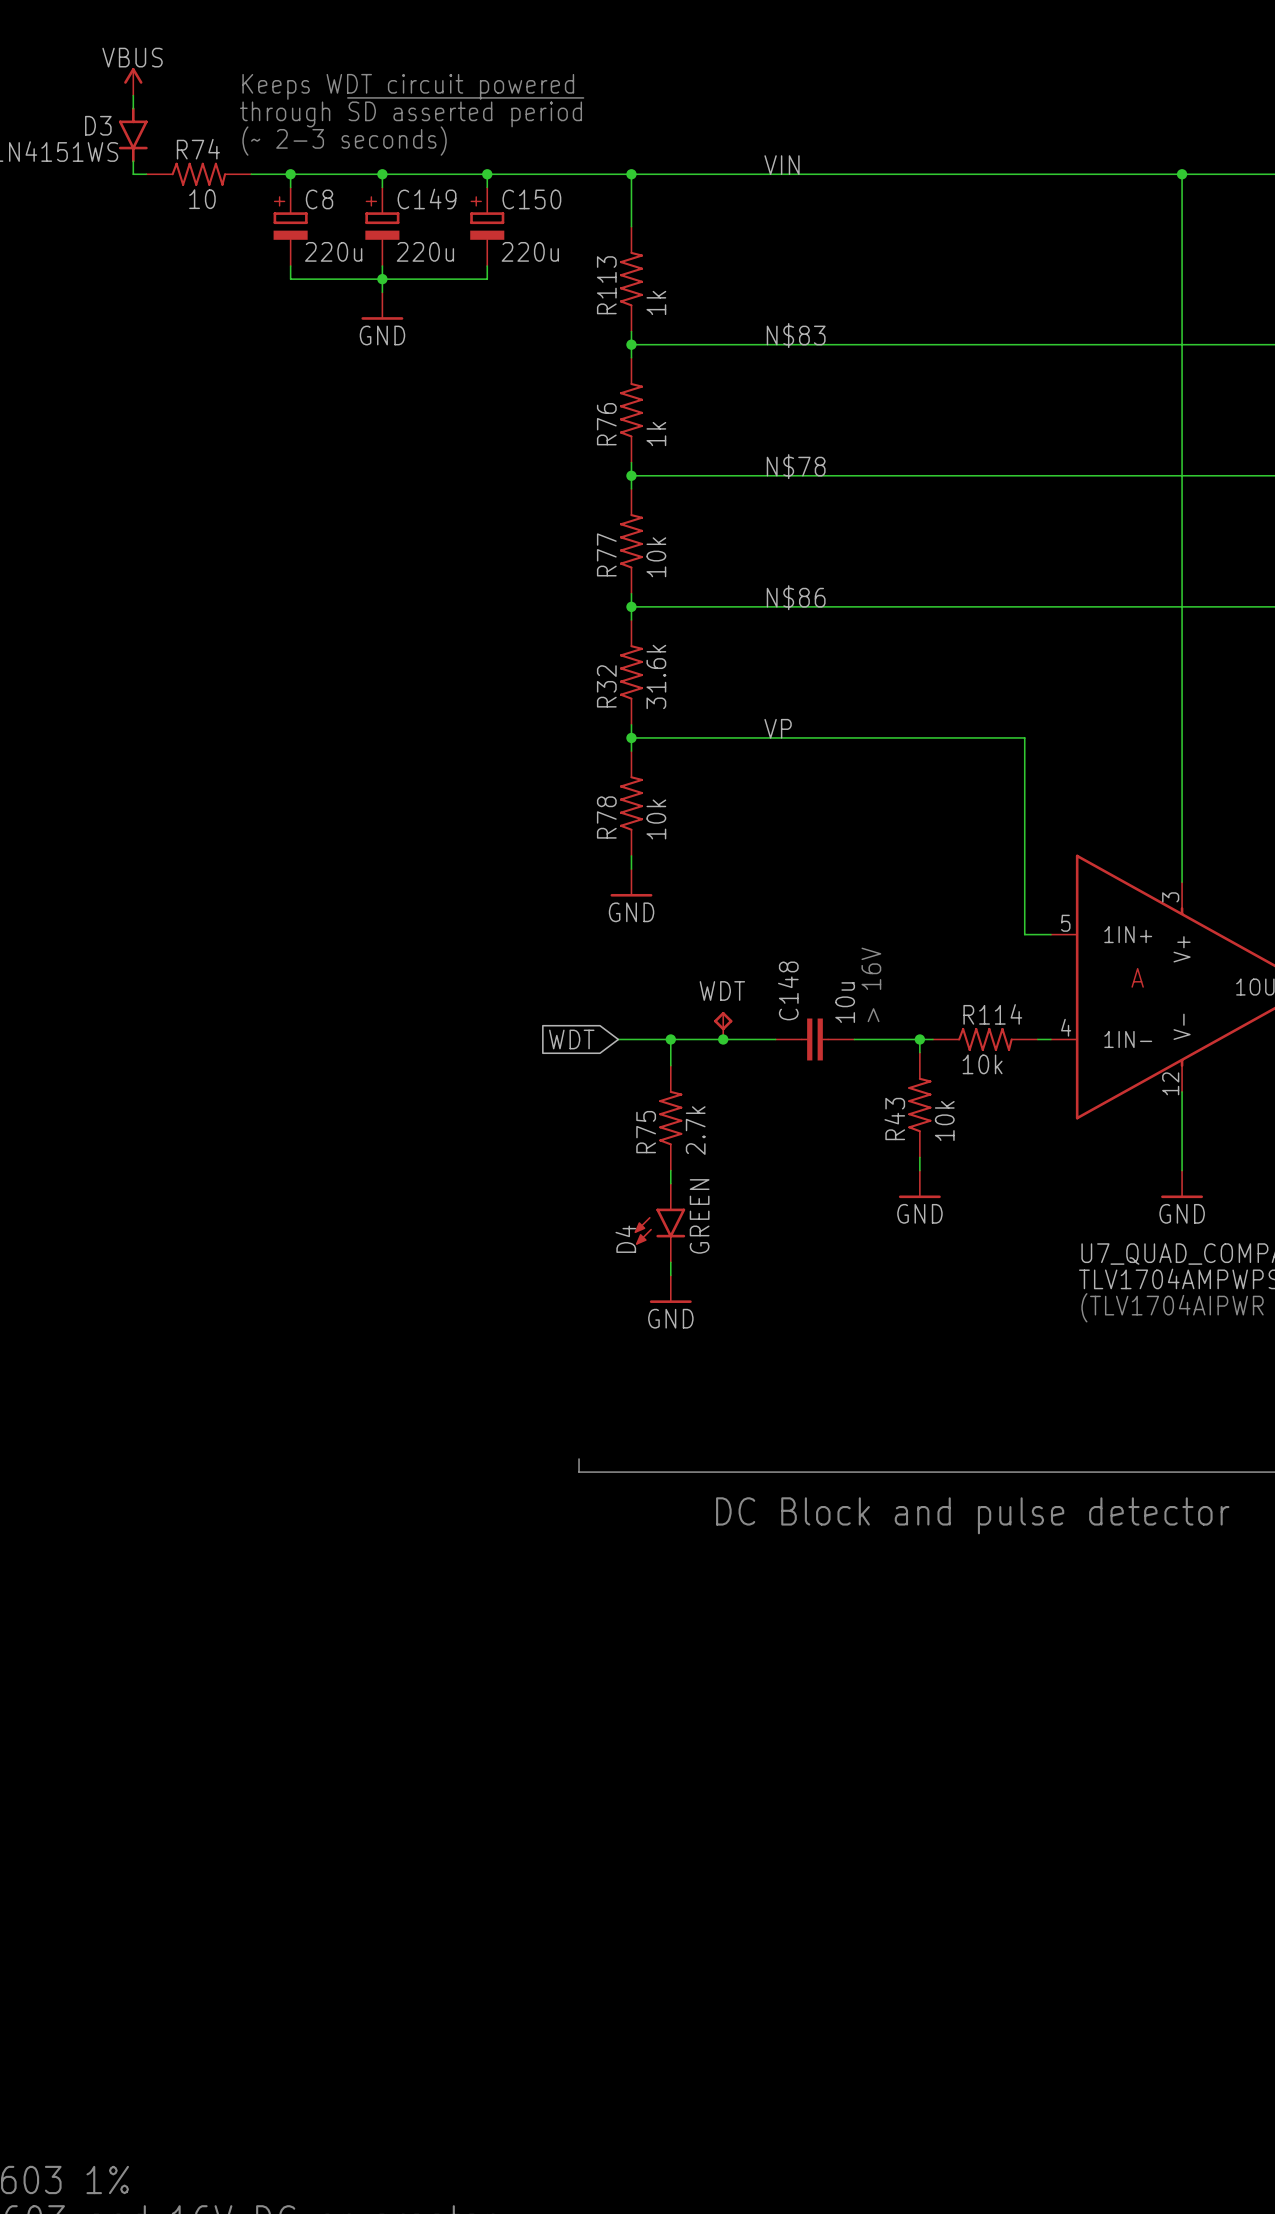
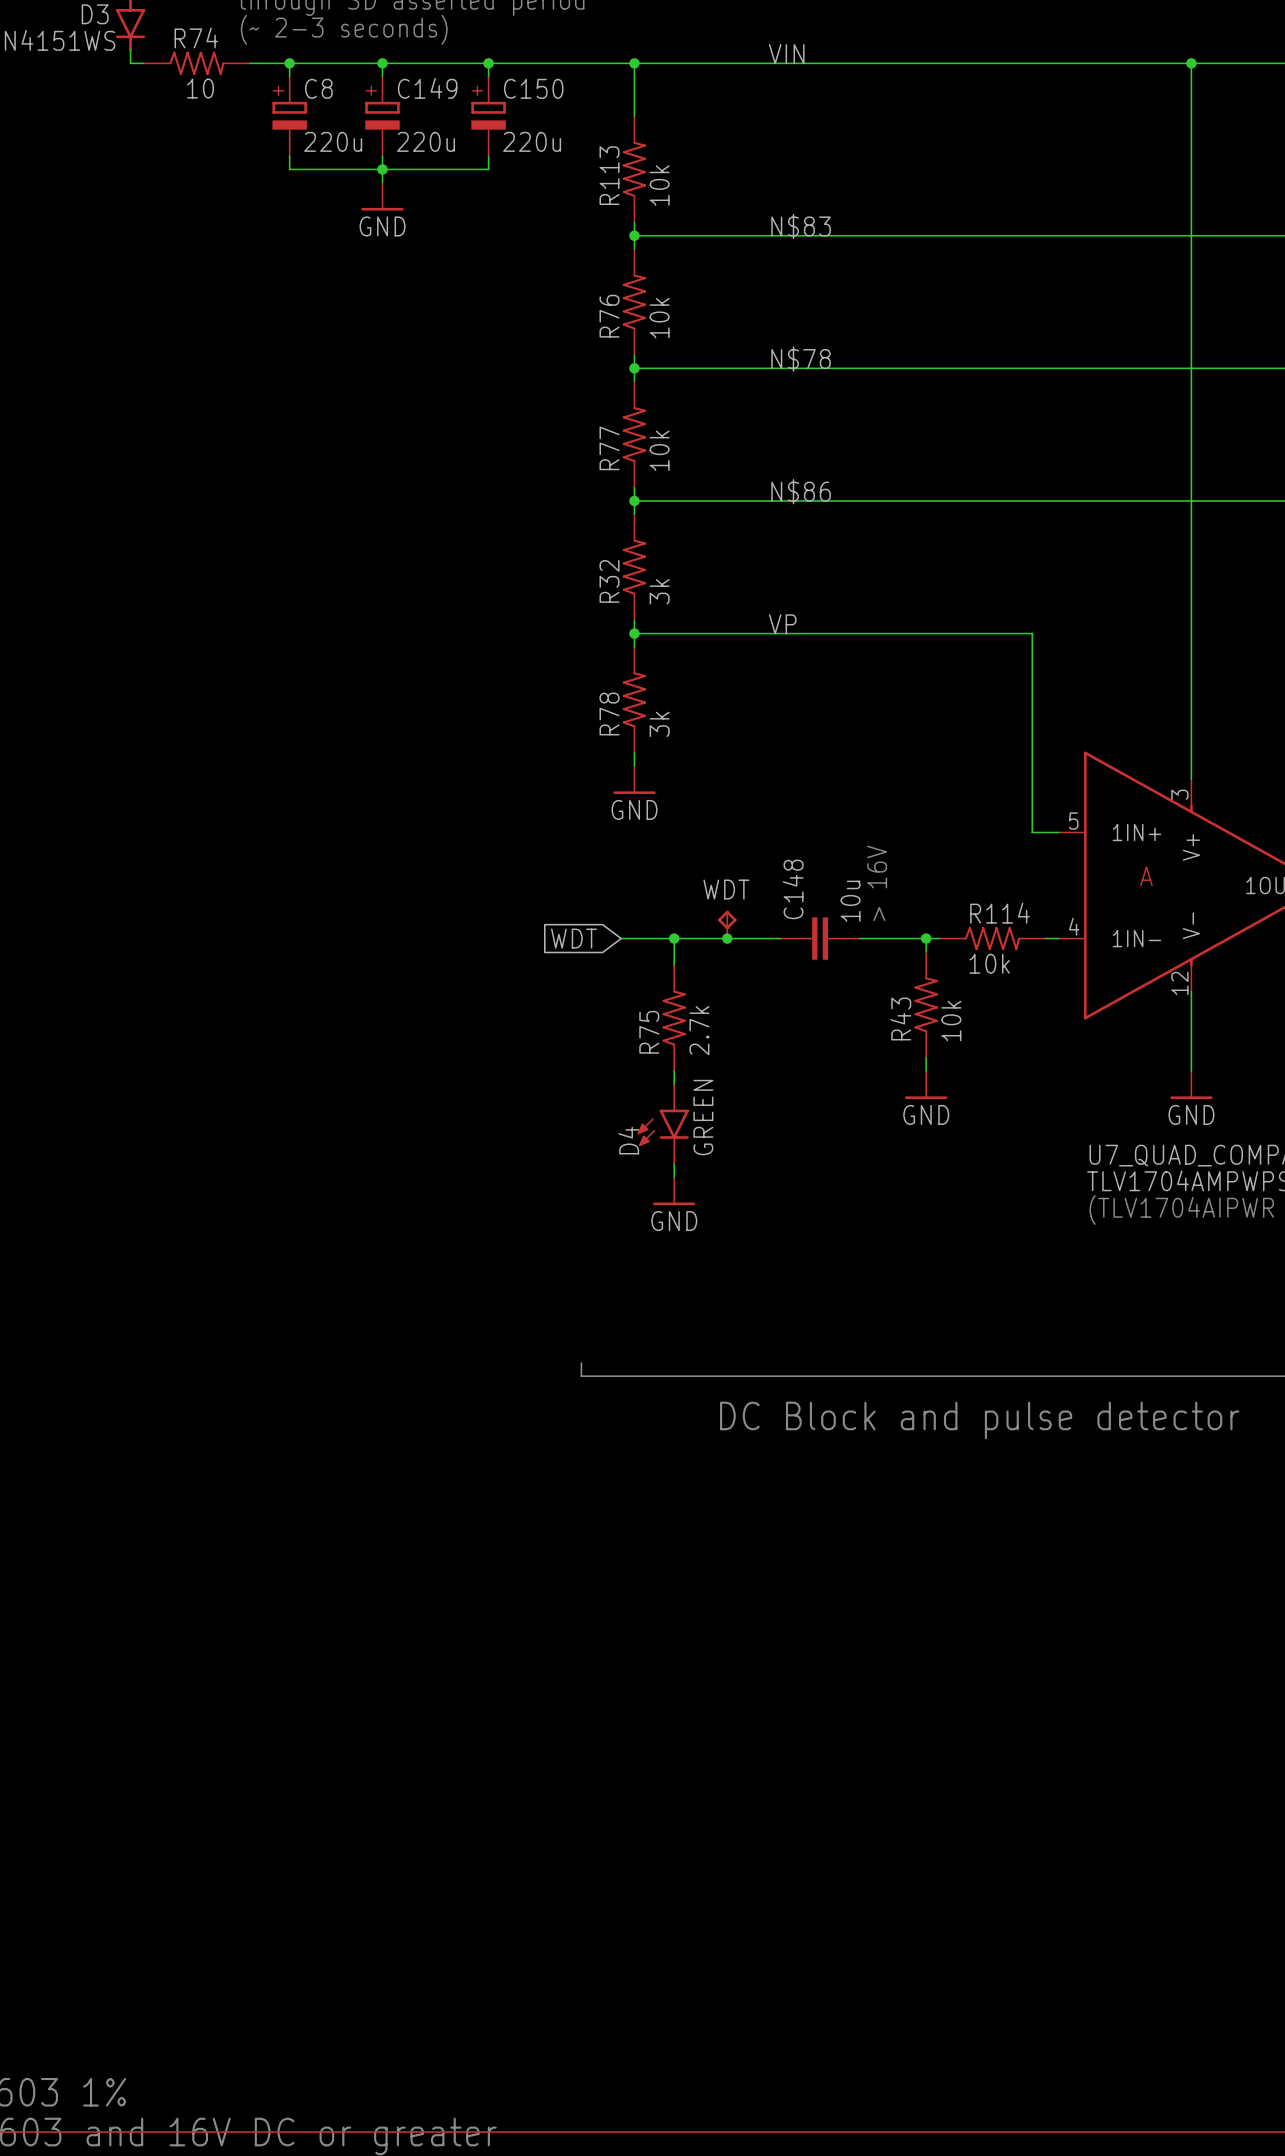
R113 value: 1k (656, 302) -> 10k (659, 185)
R76 value: 1k (656, 434) -> 10k (659, 318)
R32 value: 31.6k (656, 676) -> 3k (659, 591)
R78 value: 10k (656, 819) -> 3k (659, 724)

